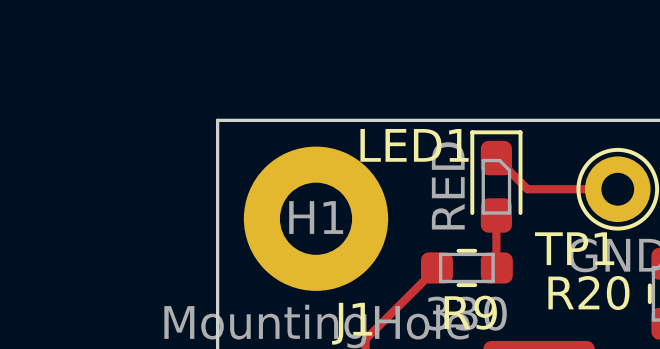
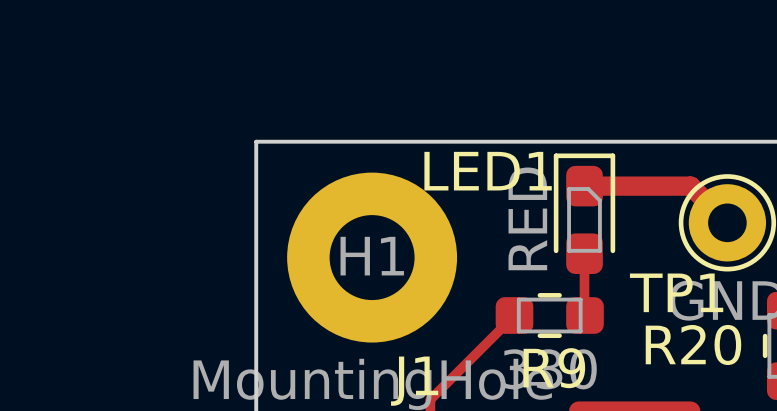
top track: (496, 158) (527, 189) (617, 189) -> (584, 186) (690, 186) (727, 222)

